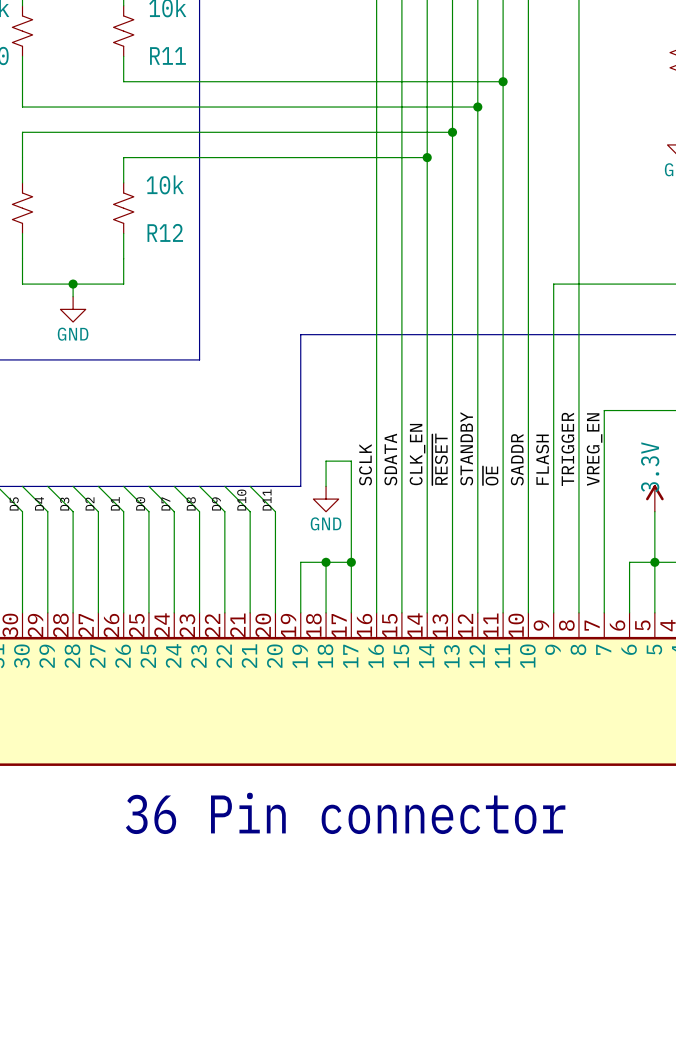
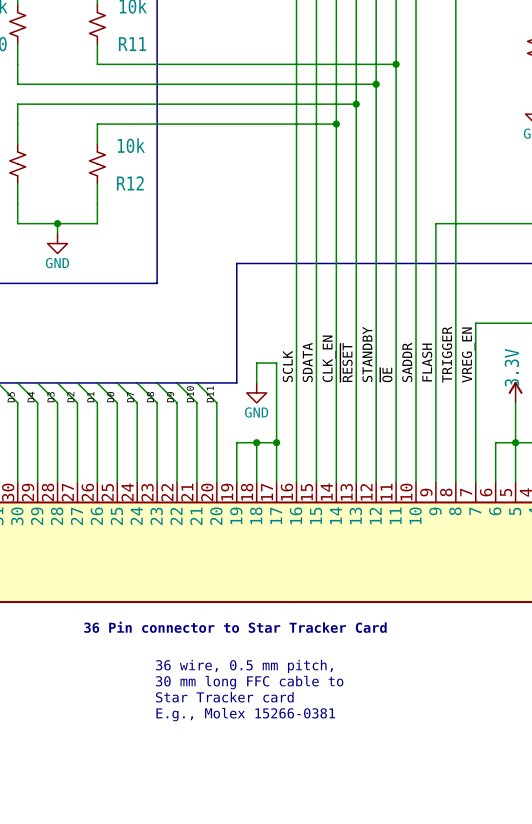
text: 36 Pin connector (345, 813) -> 36 Pin connector to Star Tracker Card (235, 627)
text: none -> 36 wire, 0.5 mm pitch, (244, 666)
text: none -> 30 mm long FFC cable to (249, 682)
text: none -> Star Tracker card (224, 697)
text: none -> E.g., Molex 15266-0381 (245, 714)

